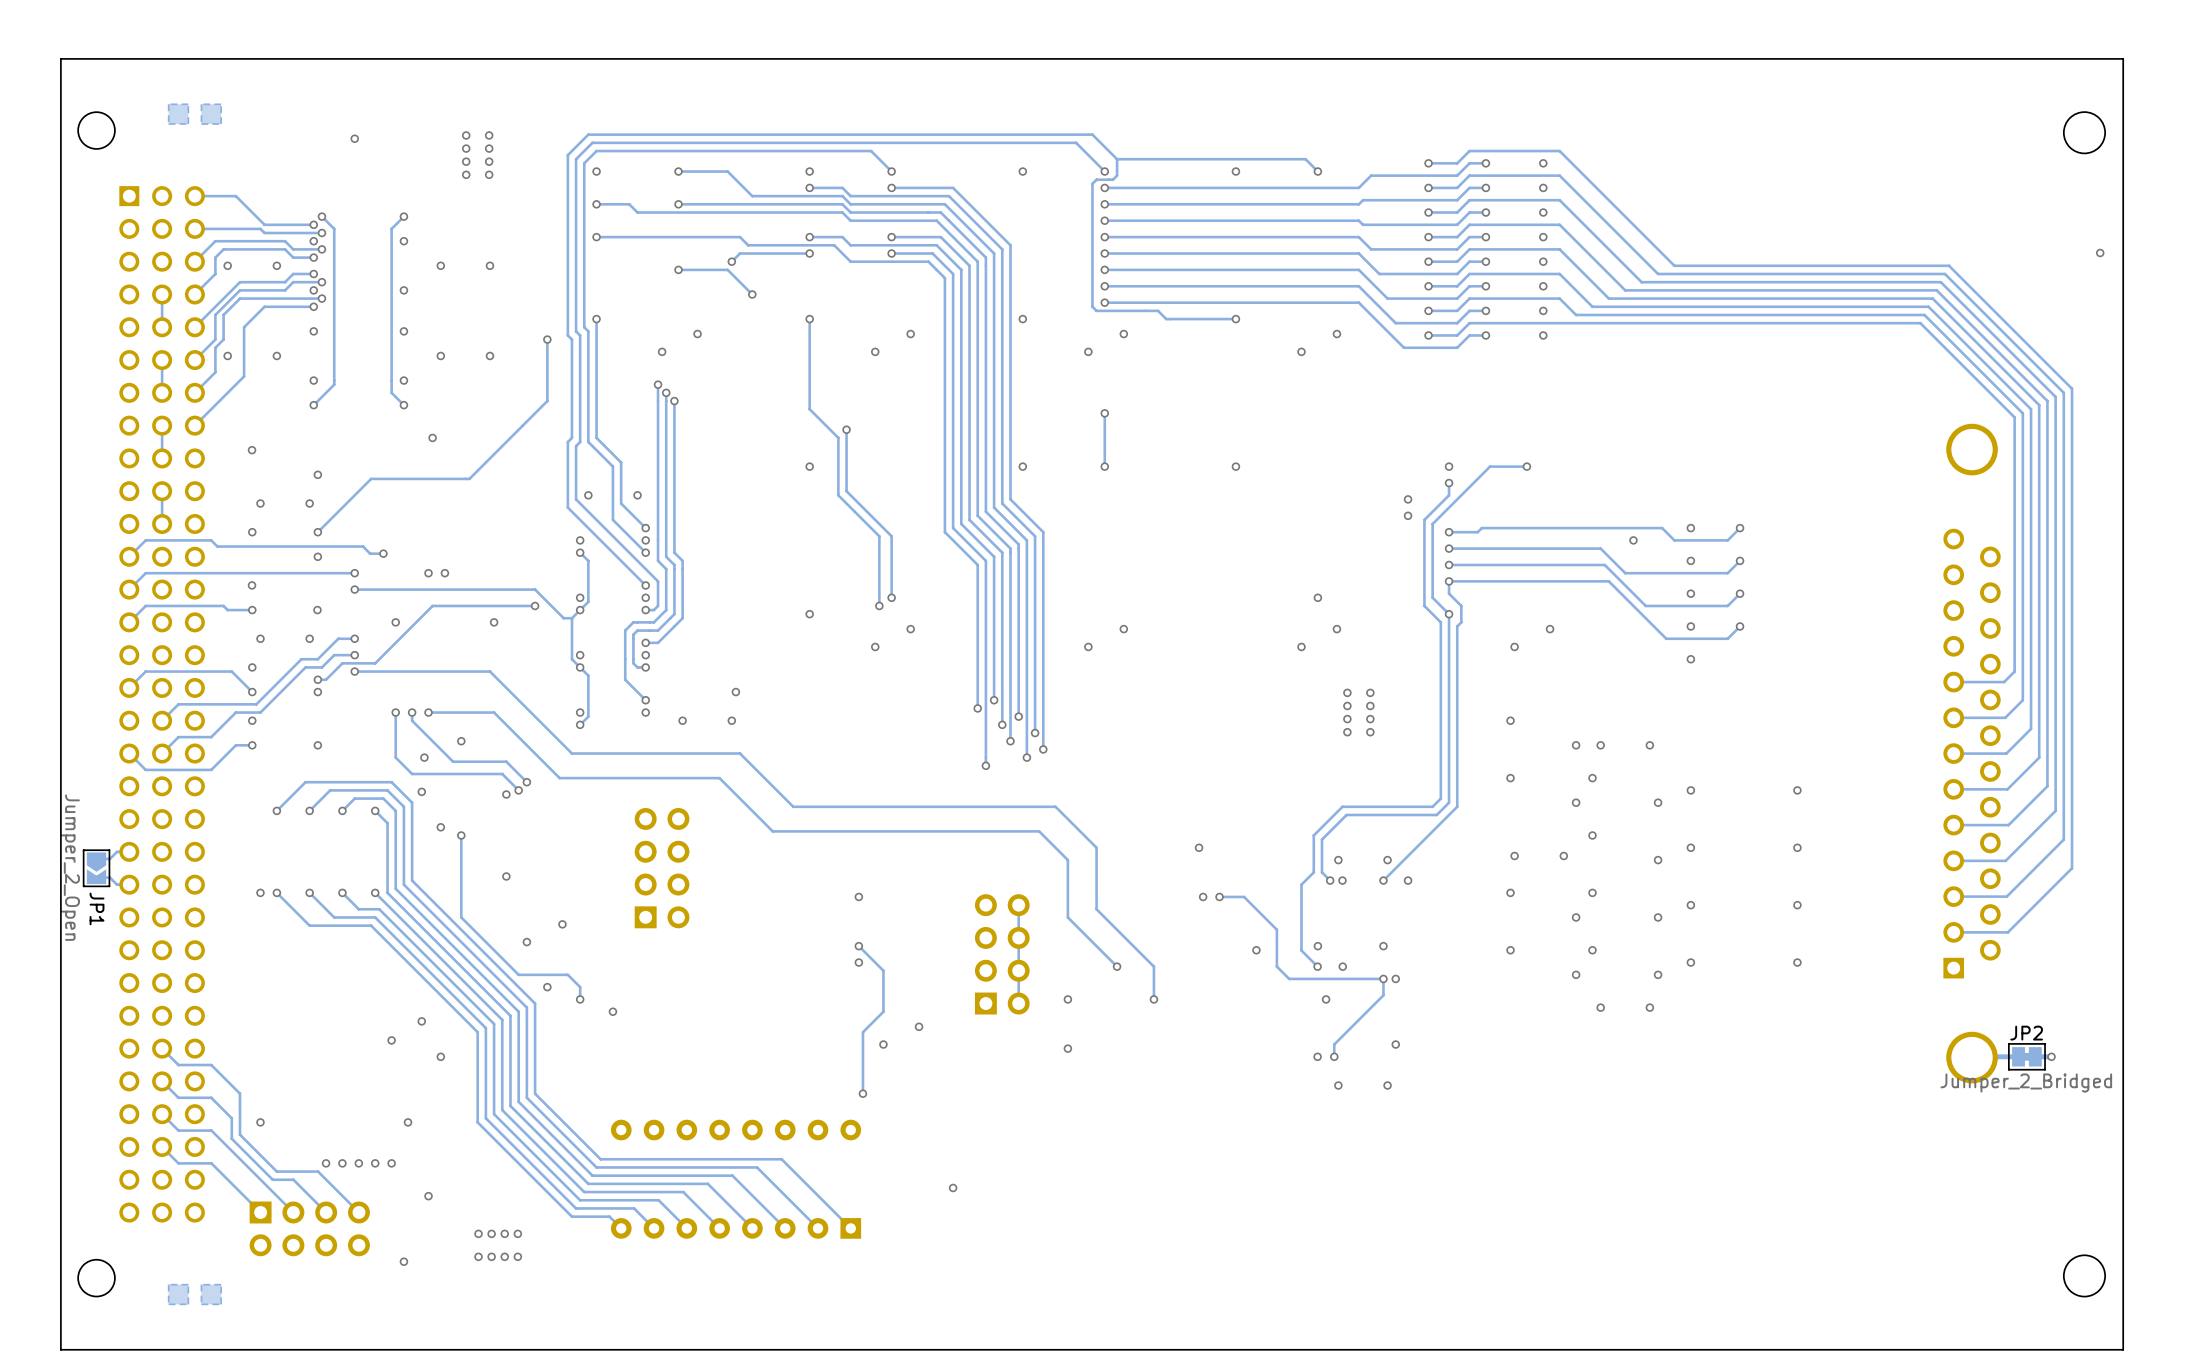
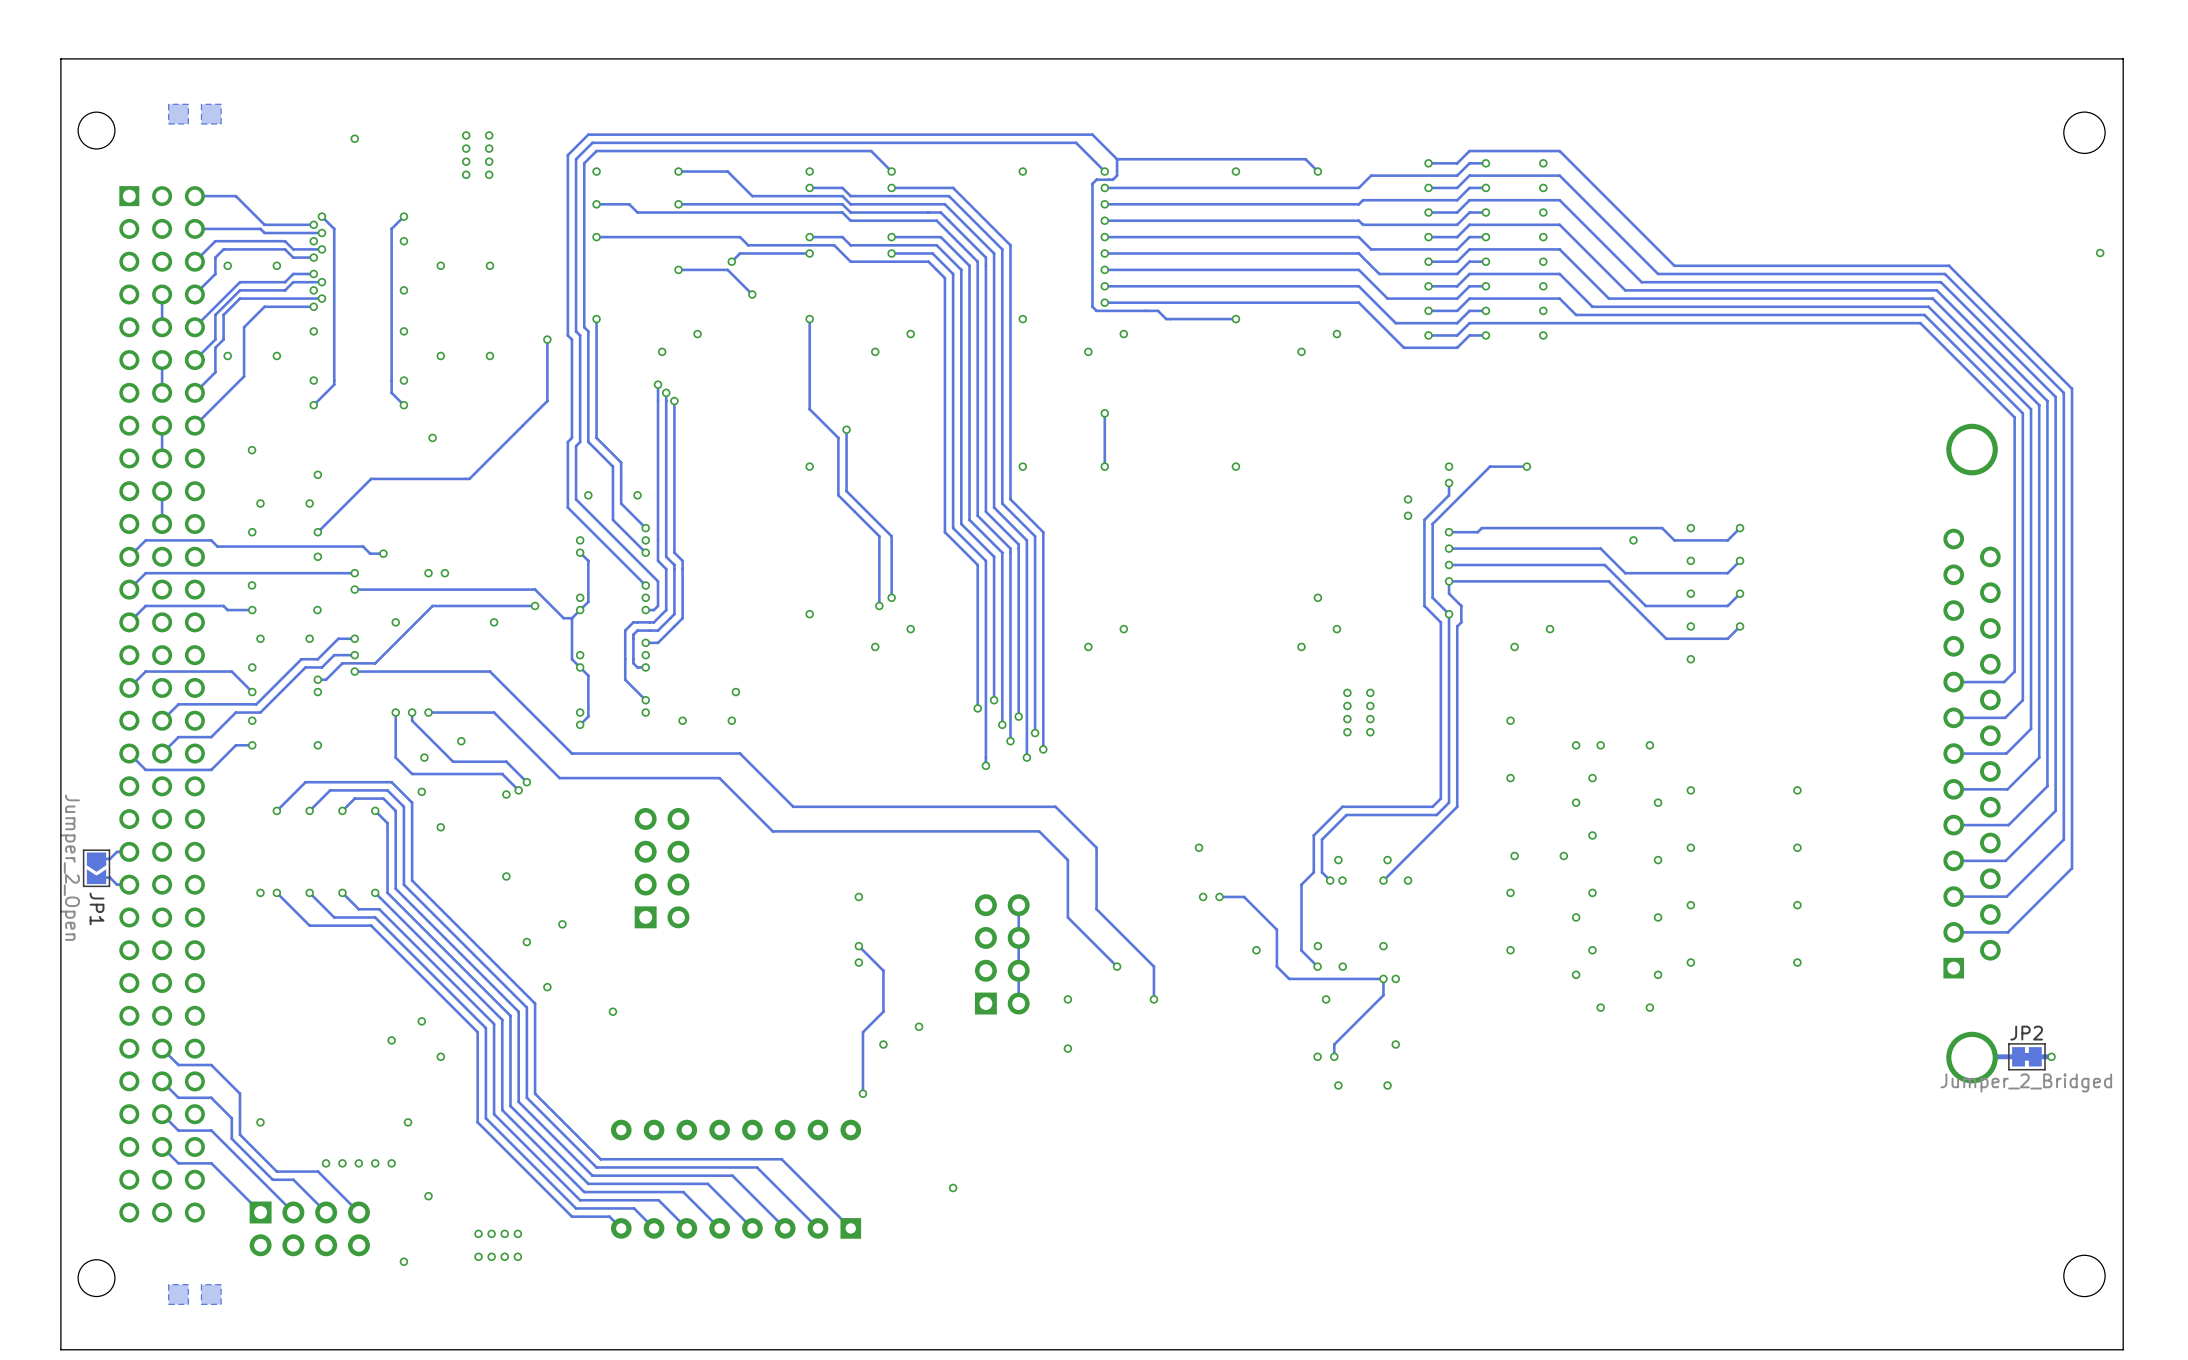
track: (461, 835) (461, 917) (518, 974) (567, 974) (580, 987) (580, 999) -> none
via: (461, 835) -> none
via: (580, 999) -> none

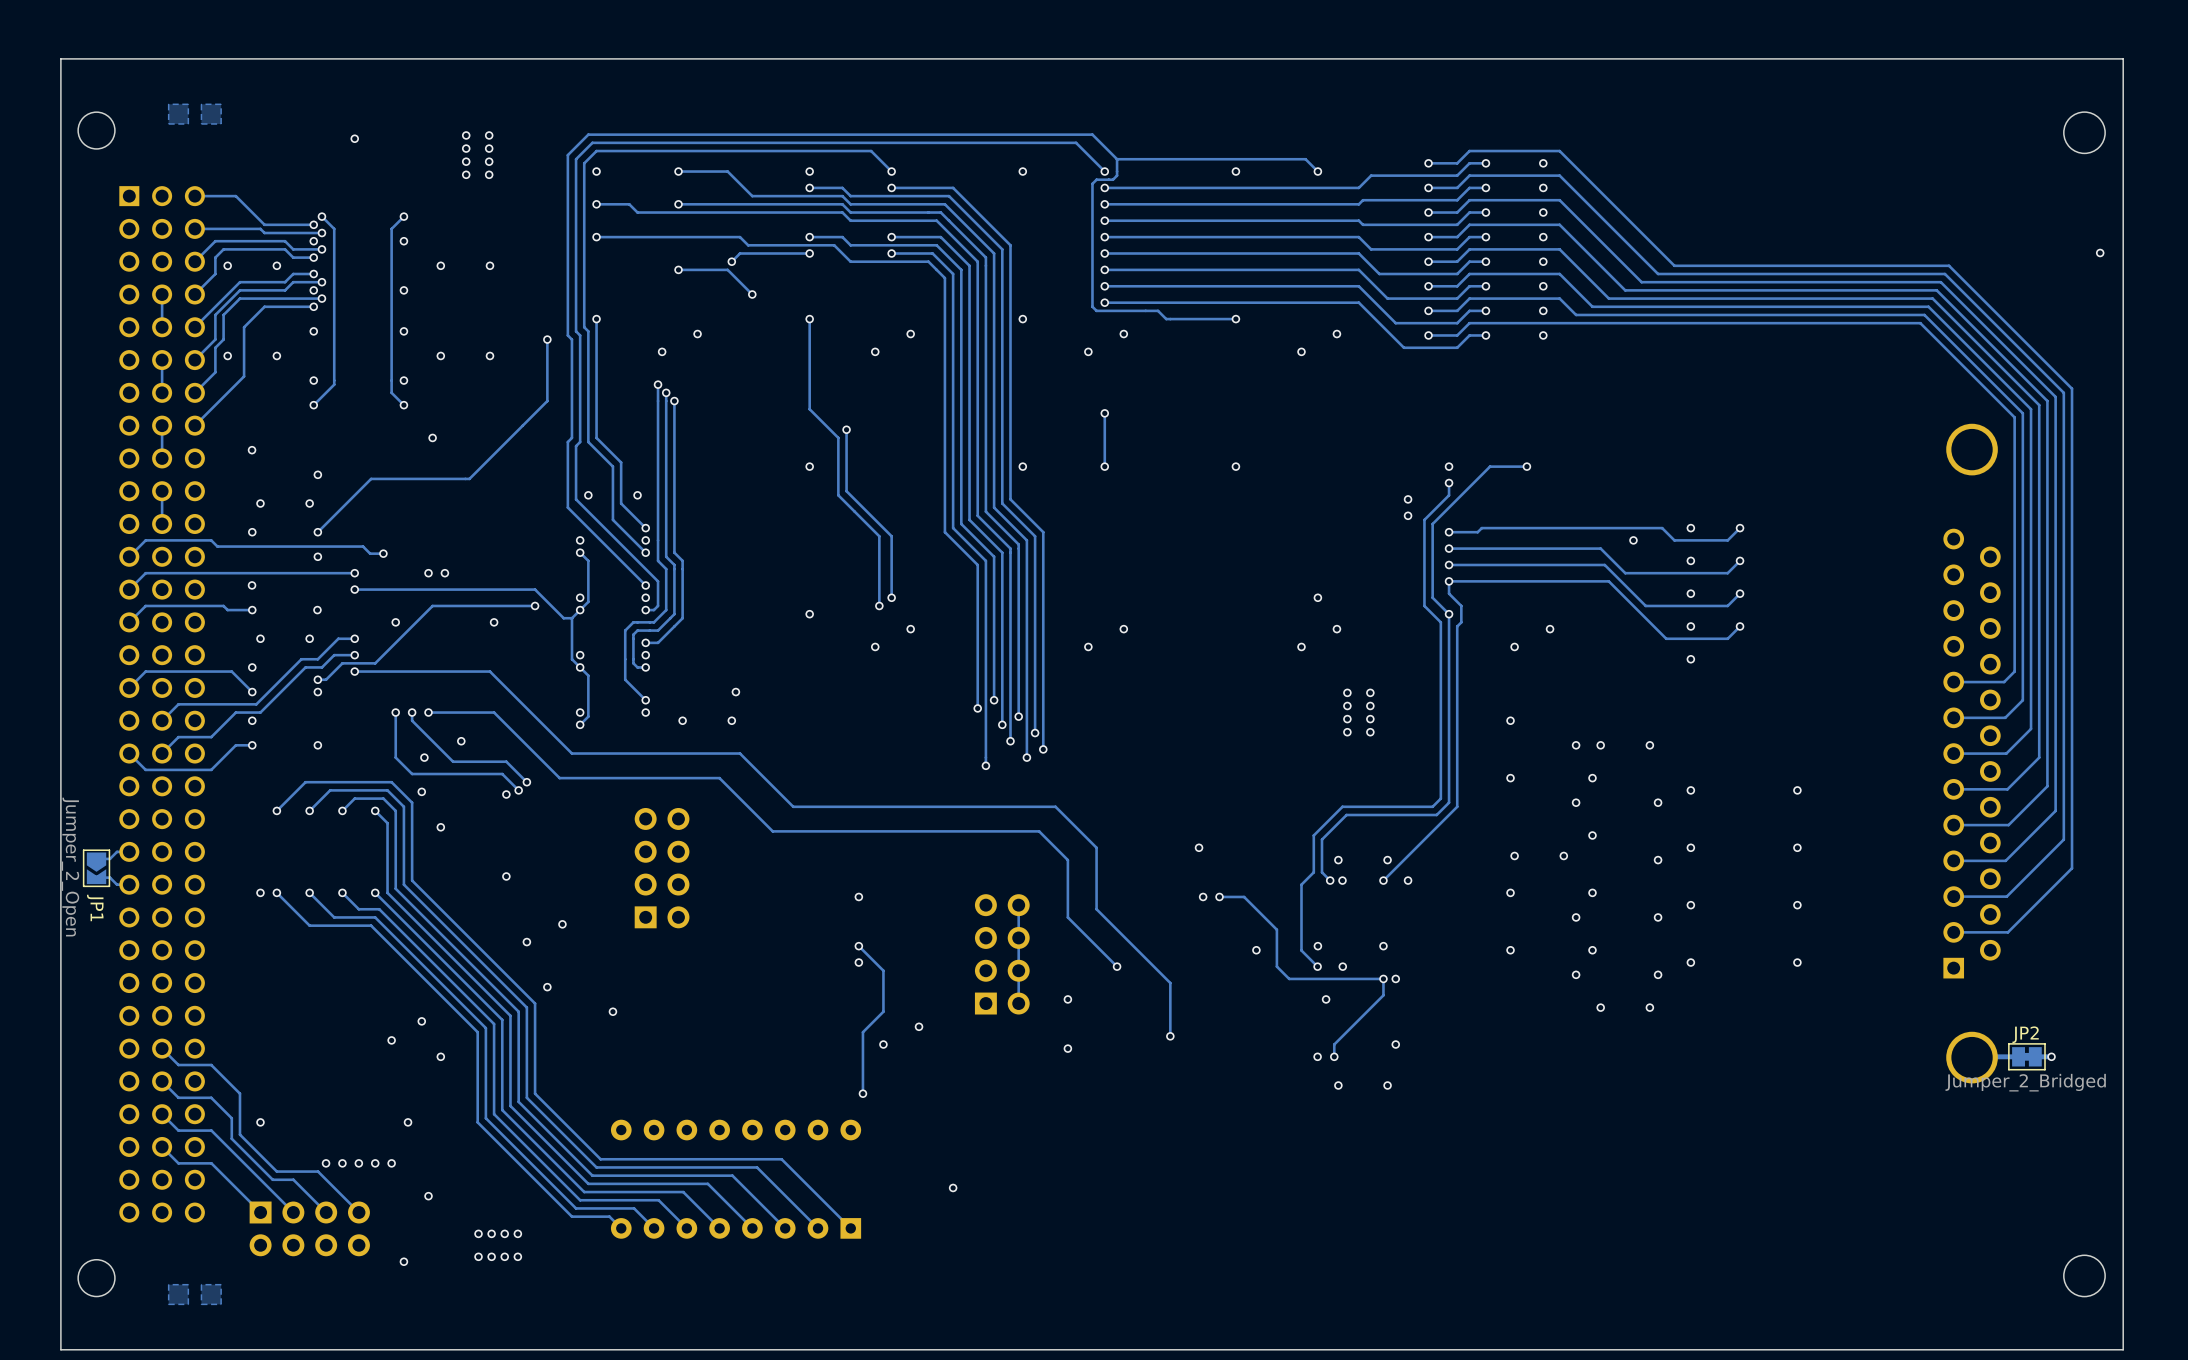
track: (1153, 966) (1153, 999) -> (1153, 966) (1170, 983) (1170, 1036)
via position: (1153, 999) -> (1170, 1036)

